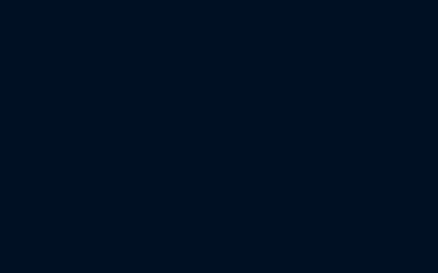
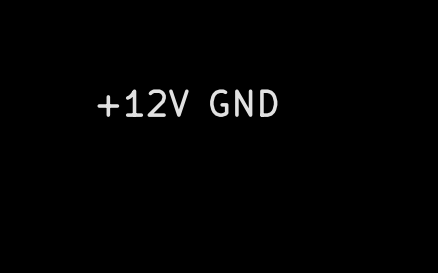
text: none -> +12V GND (187, 103)

